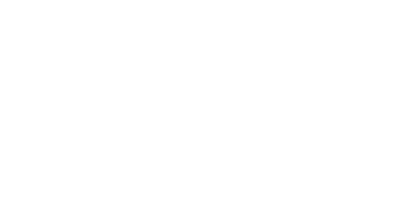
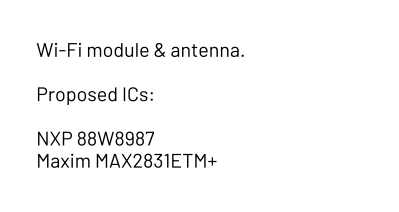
text: none -> Wi-Fi module & antenna. (140, 49)
text: none -> Proposed ICs: (95, 96)
text: none -> NXP 88W8987 (96, 138)
text: none -> Maxim MAX2831ETM+ (127, 160)

